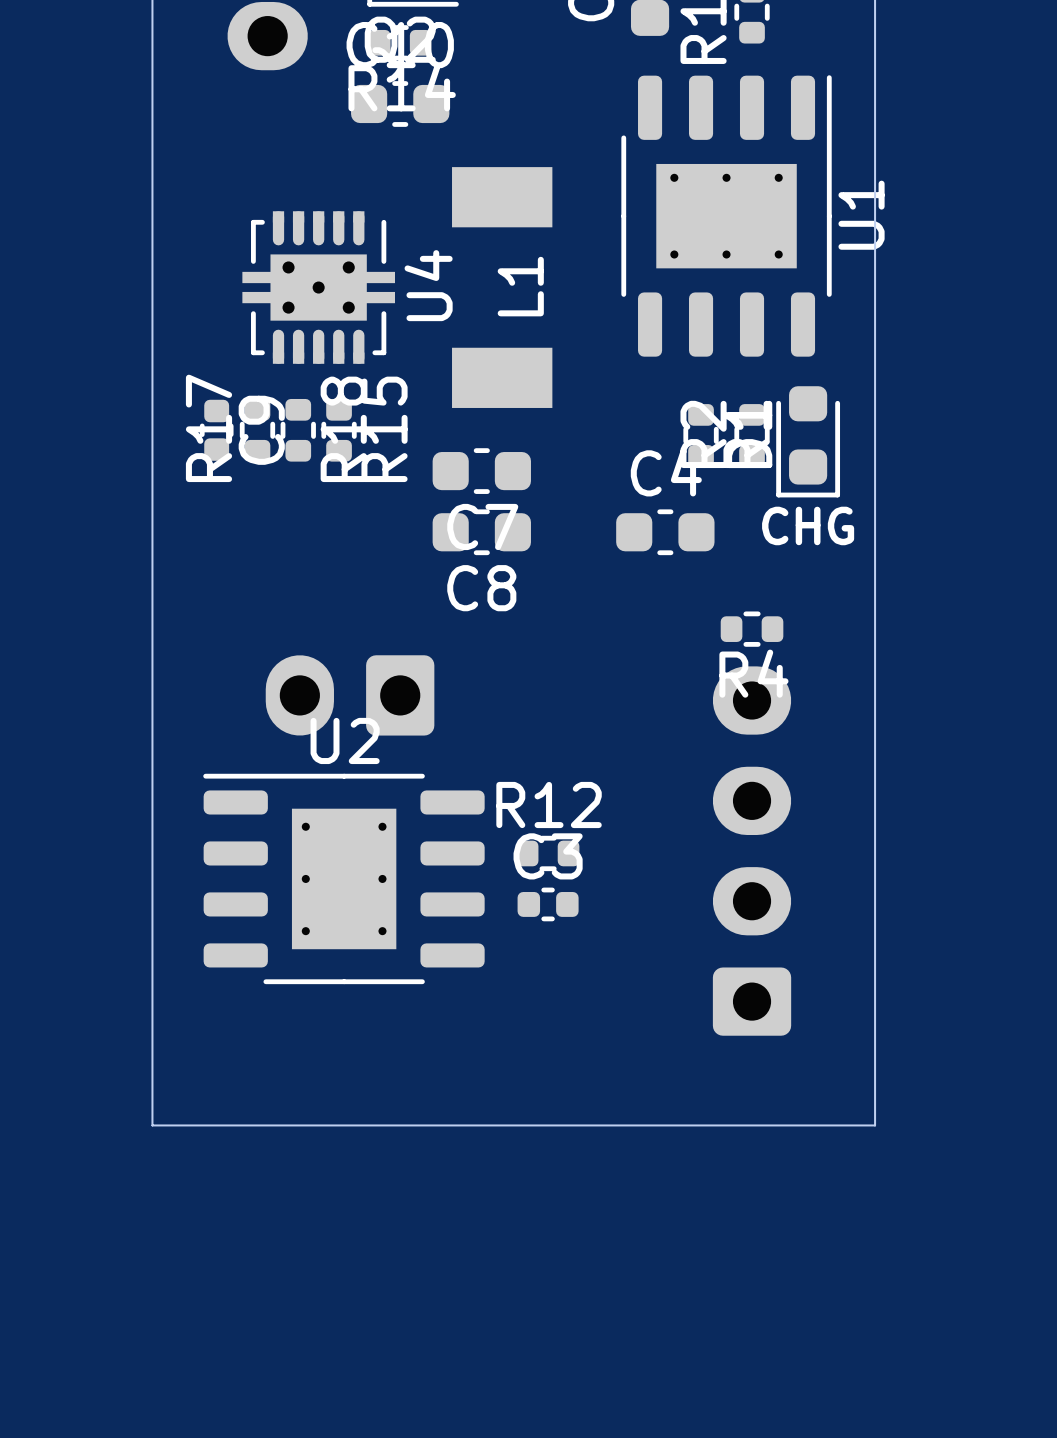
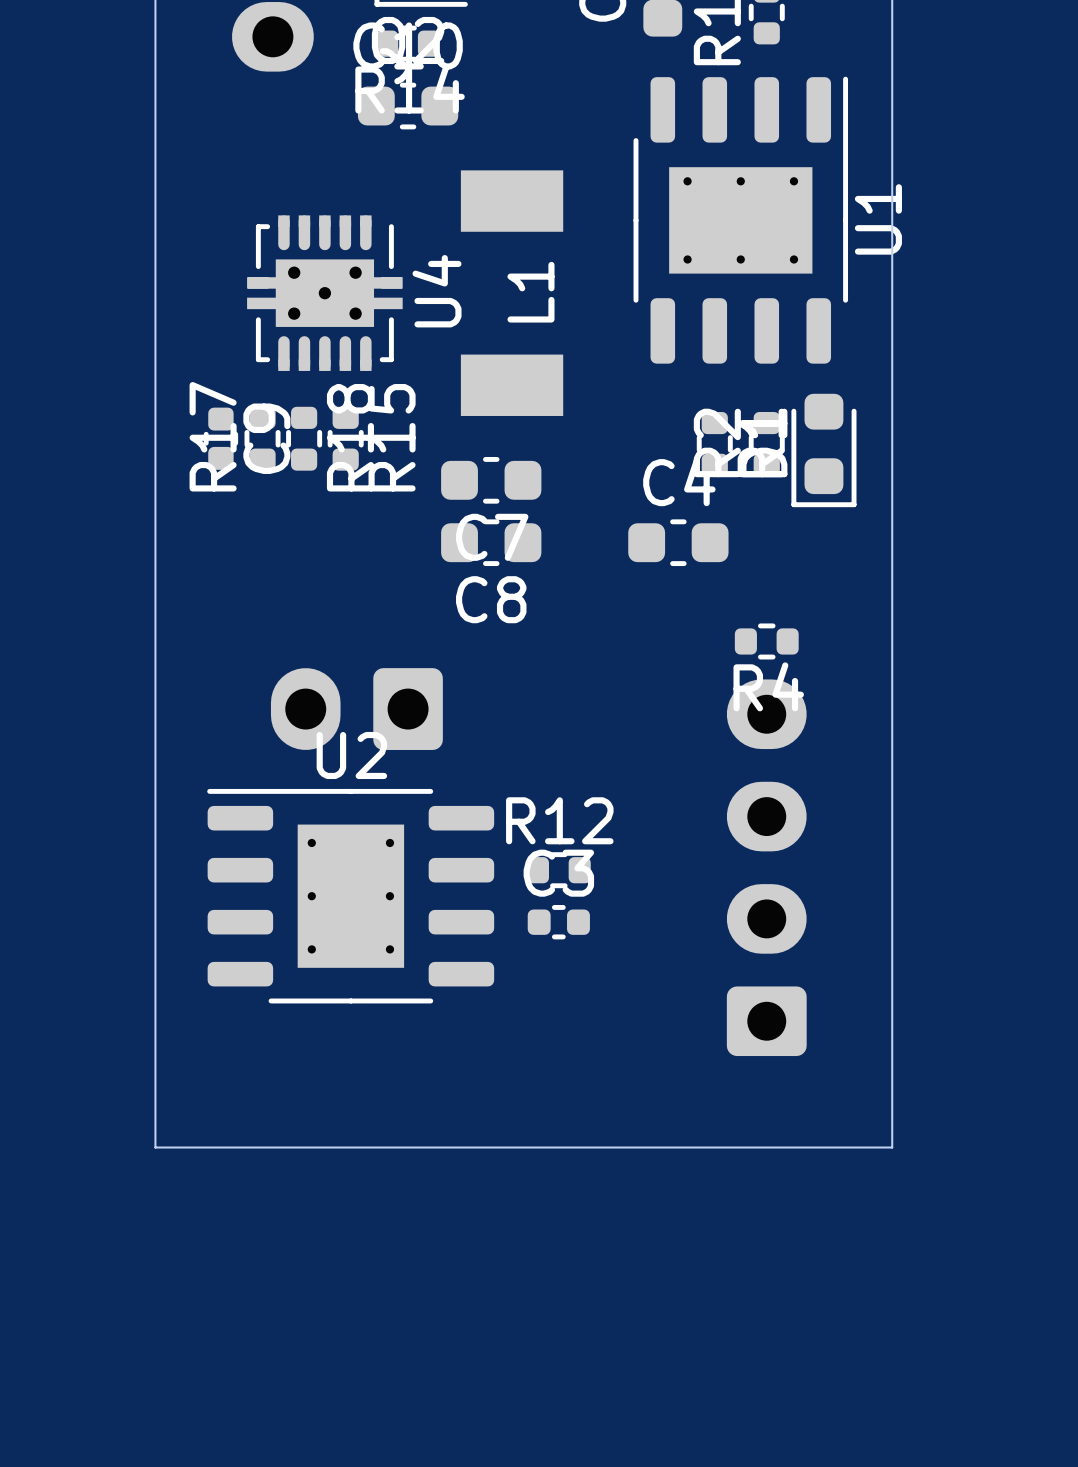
text: CHG (808, 525) -> none

